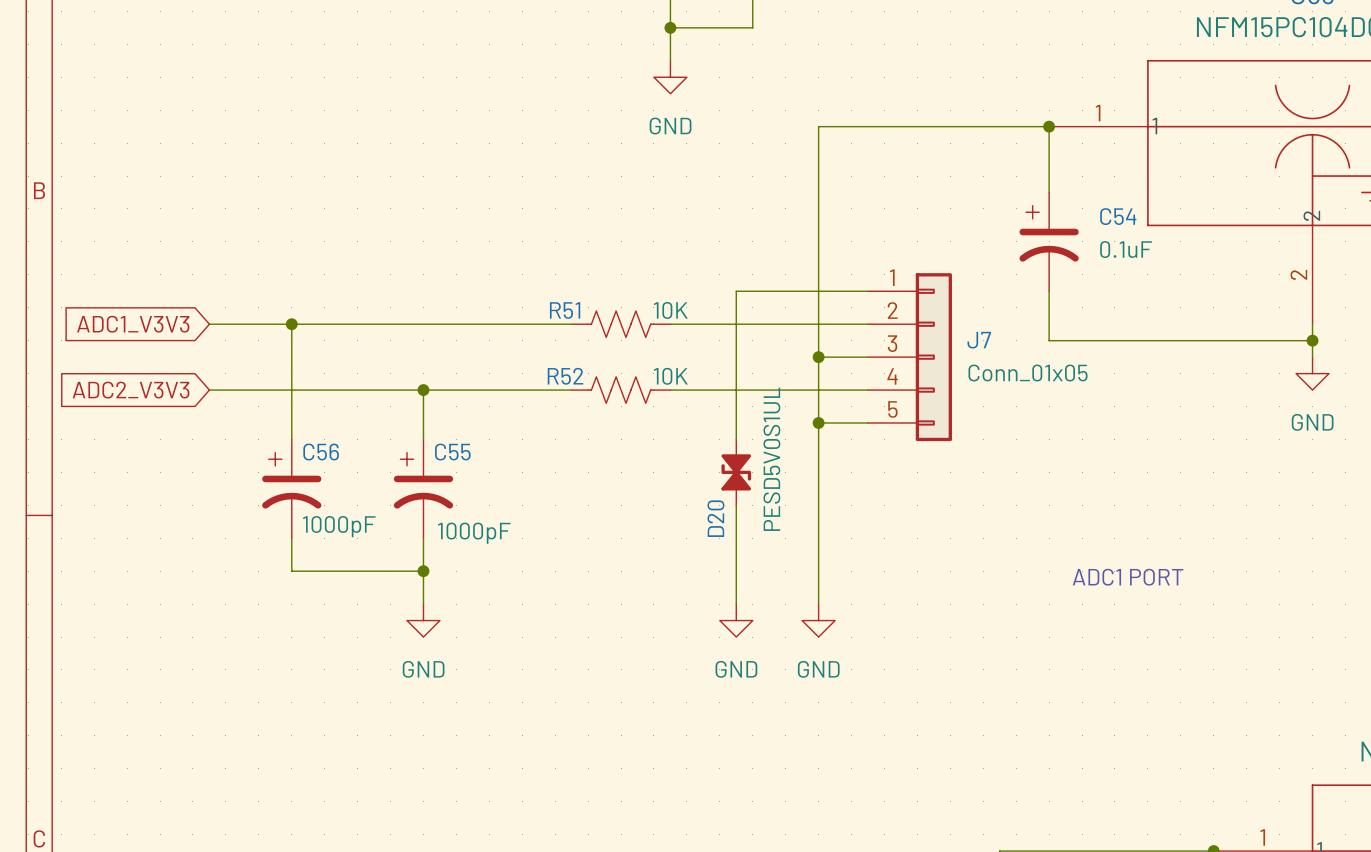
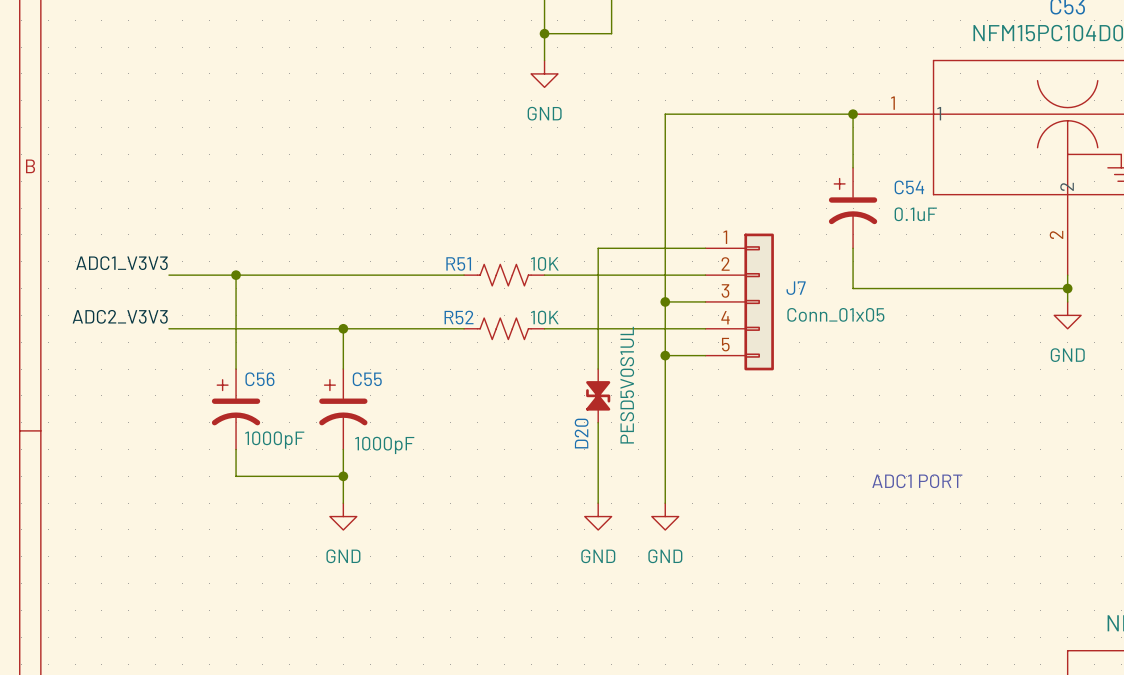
label: none -> ADC1_V3V3 (121, 263)
global label: ADC1_V3V3 (133, 324) -> none
label: none -> ADC2_V3V3 (120, 316)
global label: ADC2_V3V3 (131, 390) -> none

